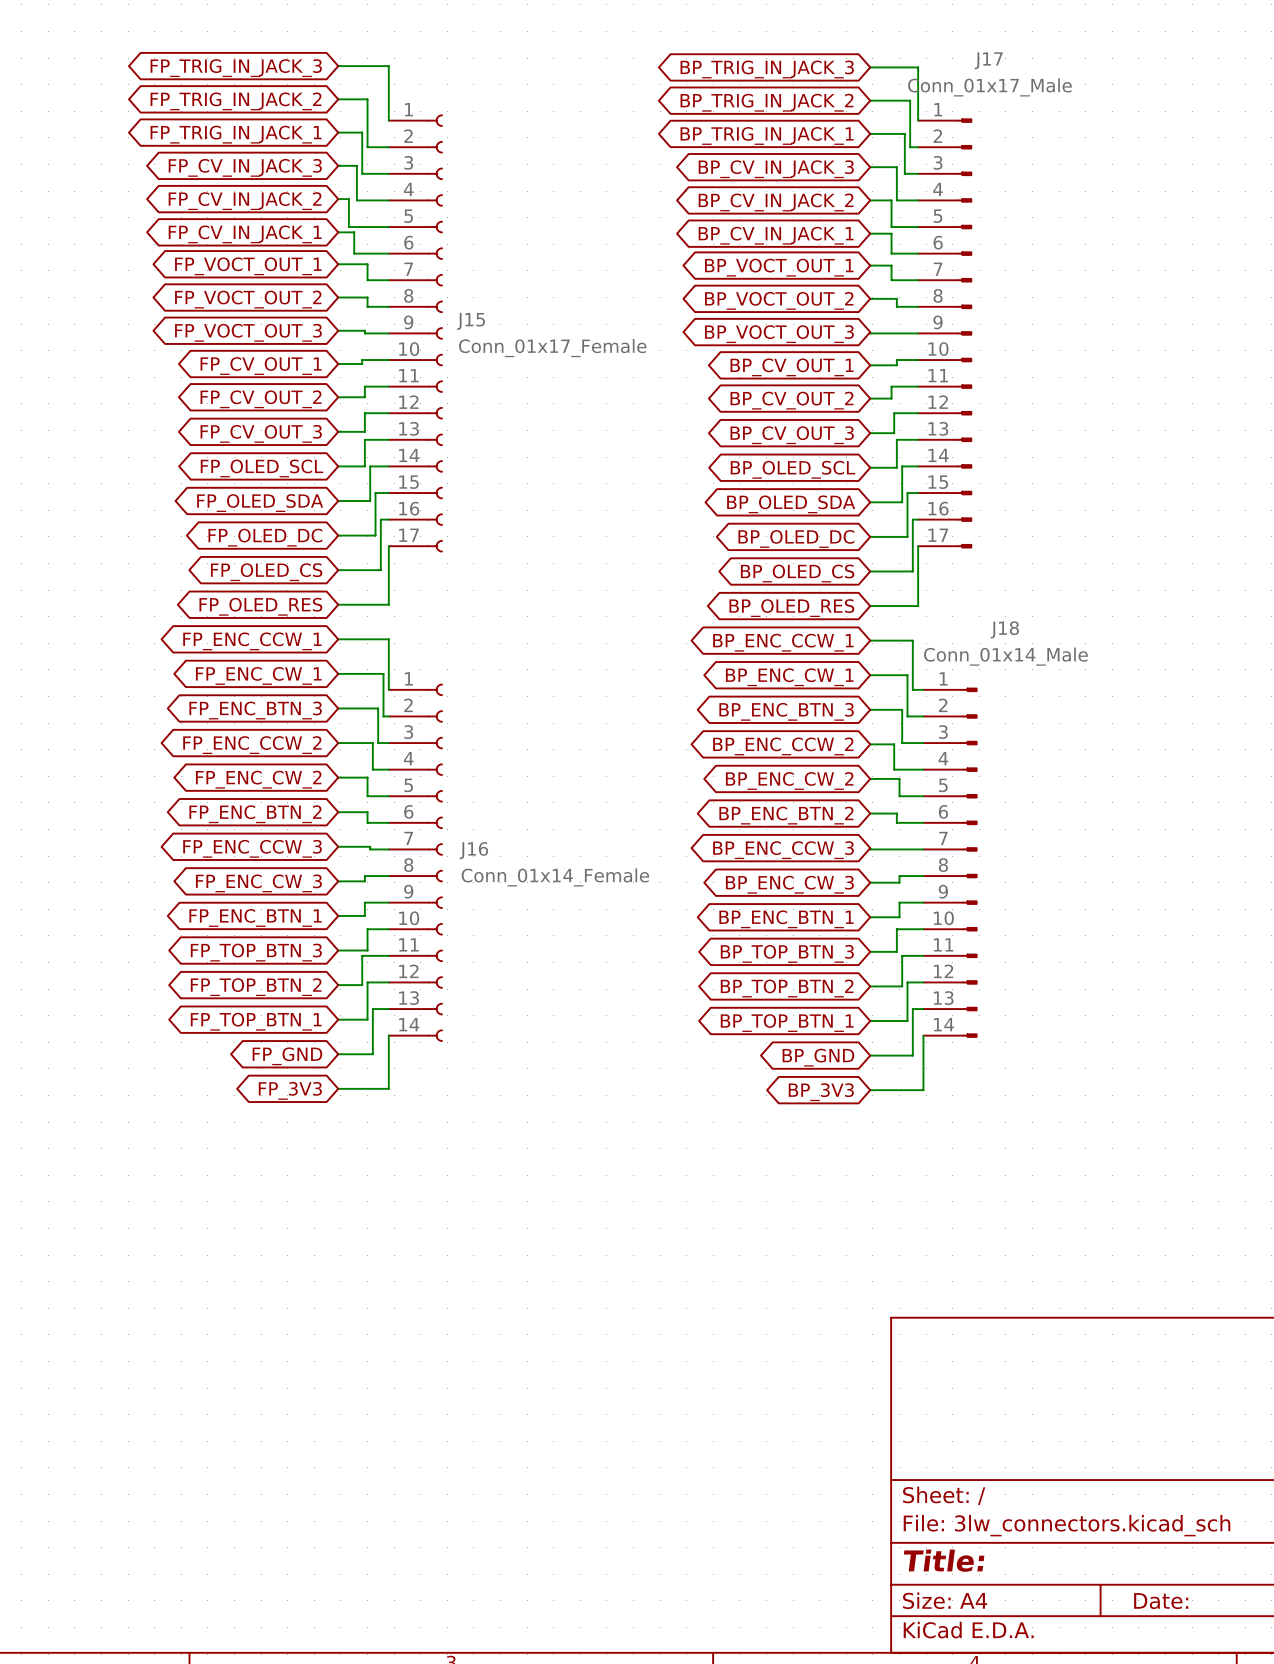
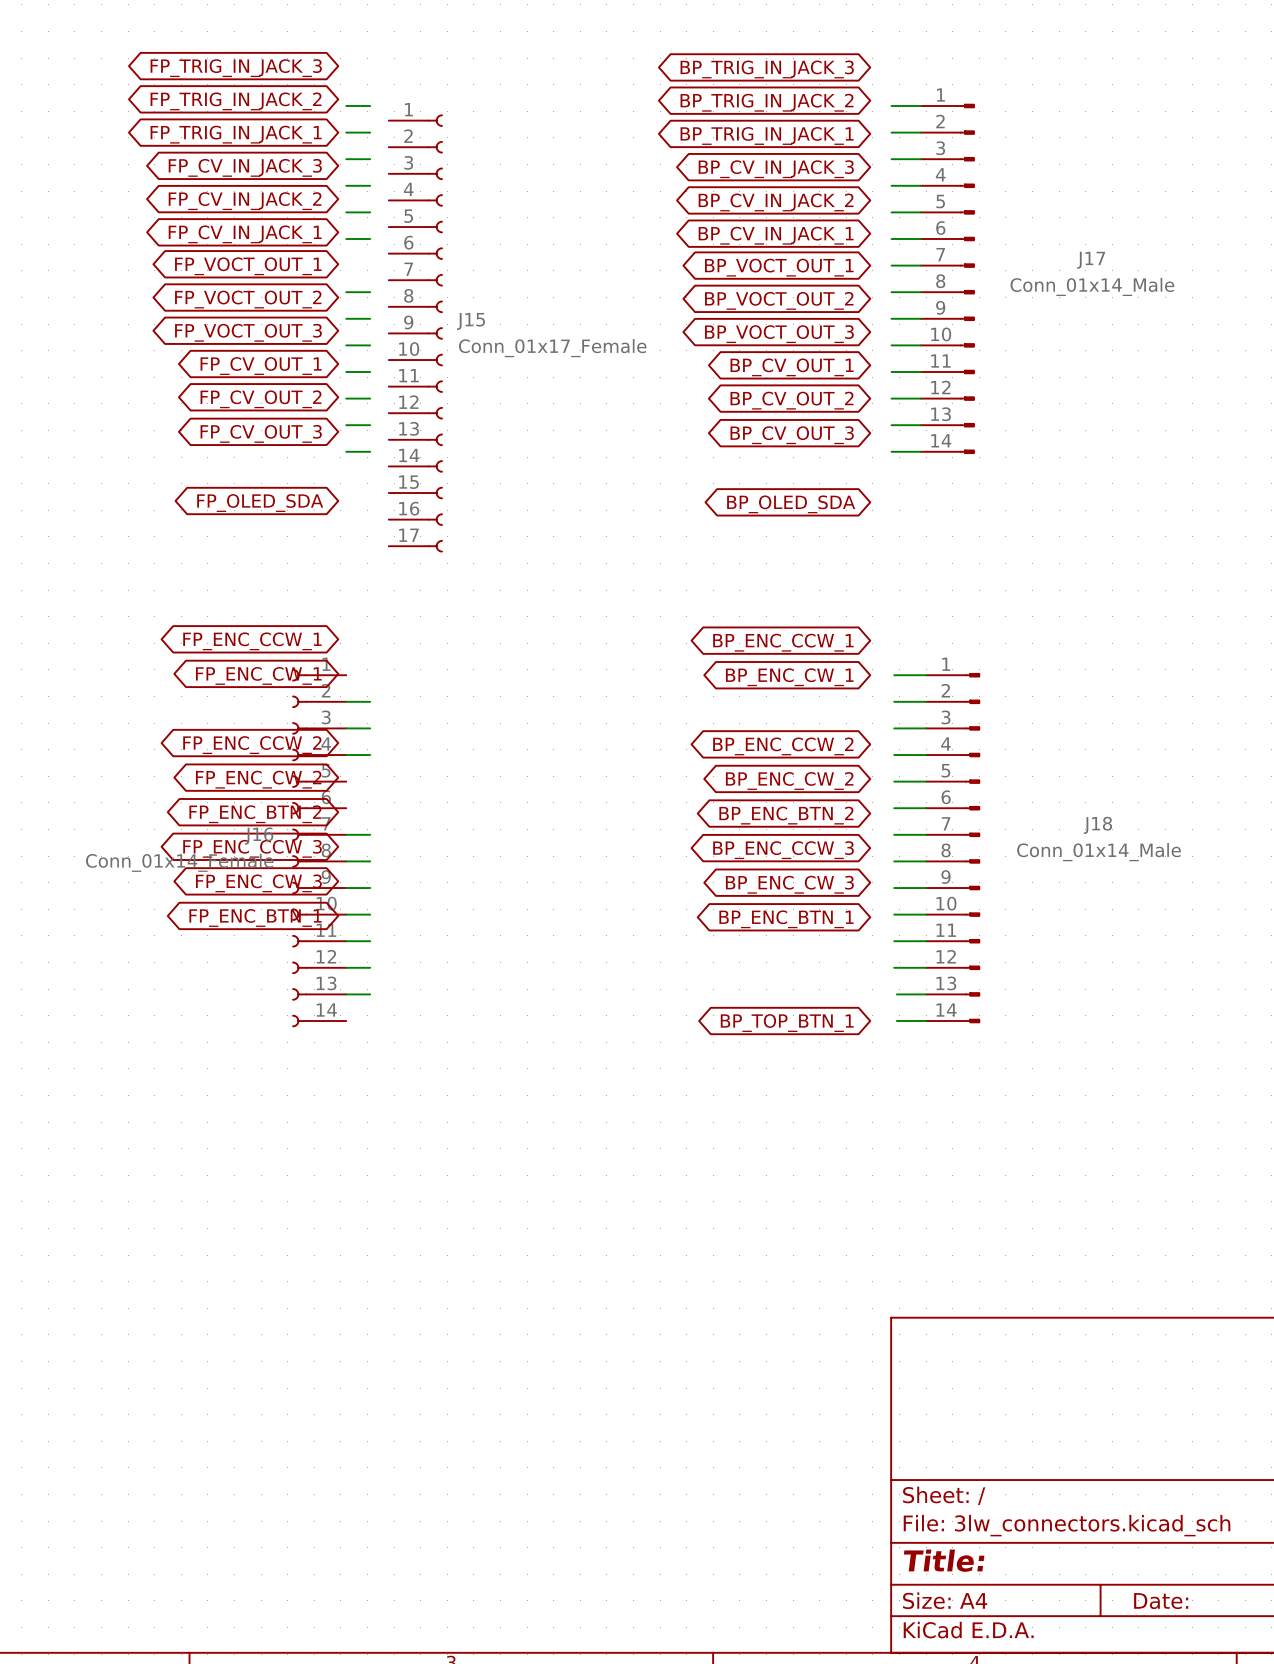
J17 name position: J17 (988, 60) -> J17 (1091, 260)
wire: (338, 66) (388, 66) (388, 120) -> none
wire: (870, 67) (918, 67) (918, 120) -> none
J17 value: Conn_01x17_Male (989, 87) -> Conn_01x14_Male (1092, 286)
wire: (338, 99) (367, 99) (367, 147) (388, 147) -> none
wire: (870, 100) (910, 100) (910, 147) (918, 147) -> none
wire: none -> (346, 106) (370, 106)
wire: none -> (891, 106) (920, 106)
J17 symbol: [918, 118, 973, 549] -> [920, 103, 975, 454]
wire: (338, 132) (346, 132) -> none
wire: (362, 132) (362, 173) (388, 173) -> (362, 132) (370, 132)
wire: none -> (891, 132) (920, 132)
wire: (870, 133) (904, 133) (904, 173) (918, 173) -> none
wire: none -> (346, 159) (370, 159)
wire: none -> (891, 159) (920, 159)
wire: (338, 165) (356, 165) (356, 200) (388, 200) -> none
wire: (870, 167) (896, 167) (896, 200) (918, 200) -> none
wire: none -> (346, 185) (370, 185)
wire: none -> (891, 185) (920, 185)
wire: (338, 199) (348, 199) (348, 227) (388, 227) -> none
wire: (870, 200) (891, 200) (891, 227) (918, 227) -> none
wire: none -> (346, 212) (370, 212)
wire: none -> (891, 212) (920, 212)
wire: (338, 232) (354, 232) (354, 253) (388, 253) -> none
wire: (870, 233) (891, 233) (891, 253) (918, 253) -> none
wire: none -> (346, 238) (370, 238)
wire: none -> (891, 238) (920, 238)
wire: (338, 264) (367, 264) (367, 280) (388, 280) -> none
wire: (870, 265) (891, 265) (891, 280) (918, 280) -> none
wire: none -> (891, 265) (920, 265)
wire: none -> (346, 292) (370, 292)
wire: none -> (891, 292) (920, 292)
wire: (338, 297) (367, 297) (367, 306) (388, 306) -> none
wire: (870, 298) (896, 298) (896, 306) (918, 306) -> none
wire: none -> (346, 318) (370, 318)
wire: none -> (891, 318) (920, 318)
wire: (338, 330) (388, 333) -> none
wire: (870, 332) (918, 333) -> none
wire: none -> (346, 345) (370, 345)
wire: none -> (891, 345) (920, 345)
wire: (388, 360) (362, 360) (362, 364) (338, 364) -> none
wire: (918, 360) (896, 360) (896, 365) (870, 365) -> none
wire: none -> (346, 371) (370, 371)
wire: none -> (891, 371) (920, 371)
wire: (388, 386) (364, 386) (364, 397) (338, 397) -> none
wire: (918, 386) (891, 386) (891, 398) (870, 398) -> none
wire: none -> (346, 398) (370, 398)
wire: none -> (891, 398) (920, 398)
wire: (388, 413) (364, 413) (364, 431) (338, 431) -> none
wire: (918, 413) (894, 413) (894, 433) (870, 433) -> none
wire: none -> (346, 425) (370, 425)
wire: none -> (891, 425) (920, 425)
wire: (388, 439) (364, 439) (364, 466) (338, 466) -> none
wire: (918, 439) (896, 439) (896, 467) (870, 467) -> none
wire: none -> (346, 451) (370, 451)
wire: none -> (891, 451) (920, 451)
wire: (388, 466) (370, 466) (370, 501) (338, 501) -> none
wire: (918, 466) (902, 466) (902, 502) (870, 502) -> none
global label: FP_OLED_SCL (262, 468) -> none
global label: BP_OLED_SCL (792, 469) -> none
wire: (388, 493) (375, 493) (375, 535) (338, 535) -> none
wire: (918, 493) (907, 493) (907, 536) (870, 536) -> none
wire: (388, 519) (380, 519) (380, 570) (338, 570) -> none
wire: (918, 519) (912, 519) (912, 571) (870, 571) -> none
global label: FP_OLED_DC (265, 537) -> none
global label: BP_OLED_DC (796, 538) -> none
wire: (388, 546) (388, 604) (338, 604) -> none
wire: (918, 546) (918, 606) (870, 606) -> none
global label: FP_OLED_CS (266, 572) -> none
global label: BP_OLED_CS (797, 573) -> none
global label: FP_OLED_RES (260, 606) -> none
global label: BP_OLED_RES (791, 608) -> none
J18 name position: J18 (1004, 629) -> J18 (1097, 825)
wire: (338, 639) (388, 639) (388, 689) -> none
wire: (870, 640) (912, 640) (912, 689) (923, 689) -> none
J18 value position: Conn_01x14_Male (1005, 656) -> Conn_01x14_Male (1099, 852)
wire: (338, 673) (383, 673) (383, 716) (388, 716) -> none
wire: (870, 675) (894, 675) -> none
wire: (907, 675) (907, 716) (923, 716) -> (907, 675) (926, 675)
wire: none -> (346, 701) (370, 701)
wire: none -> (894, 701) (926, 701)
wire: (338, 708) (378, 708) (378, 743) (388, 743) -> none
wire: (870, 709) (902, 709) (902, 743) (923, 743) -> none
global label: FP_ENC_BTN_3 (255, 710) -> none
global label: BP_ENC_BTN_3 (786, 711) -> none
wire: none -> (346, 728) (370, 728)
wire: none -> (894, 728) (926, 728)
wire: (338, 743) (372, 743) (372, 769) (388, 769) -> none
wire: (870, 744) (894, 744) (894, 769) (923, 769) -> none
wire: none -> (346, 755) (370, 755)
wire: none -> (894, 755) (926, 755)
wire: (338, 777) (367, 777) (367, 796) (388, 796) -> none
wire: (870, 778) (899, 778) (899, 796) (923, 796) -> none
wire: none -> (894, 781) (926, 781)
wire: none -> (894, 808) (926, 808)
wire: (338, 812) (367, 812) (367, 822) (388, 822) -> none
wire: (870, 813) (896, 813) (896, 822) (923, 822) -> none
wire: none -> (346, 834) (370, 834)
wire: none -> (894, 834) (926, 834)
wire: (338, 846) (370, 846) (370, 849) (388, 849) -> none
wire: (870, 848) (923, 849) -> none
wire: none -> (346, 861) (370, 861)
wire: none -> (894, 861) (926, 861)
J16 flip: as is (435, 862) -> left-right (299, 848)
J18 position: (950, 862) -> (953, 848)
wire: (388, 876) (364, 876) (364, 881) (338, 881) -> none
wire: (923, 876) (899, 876) (899, 882) (870, 882) -> none
wire: none -> (346, 888) (370, 888)
wire: none -> (894, 888) (926, 888)
wire: (388, 902) (364, 902) (364, 915) (338, 915) -> none
wire: (923, 902) (899, 902) (899, 917) (870, 917) -> none
wire: none -> (346, 914) (370, 914)
wire: none -> (894, 914) (926, 914)
wire: (388, 929) (367, 929) (367, 950) (338, 950) -> none
wire: (923, 929) (896, 929) (896, 951) (870, 951) -> none
wire: none -> (346, 941) (370, 941)
wire: none -> (894, 941) (926, 941)
global label: FP_TOP_BTN_3 (256, 952) -> none
global label: BP_TOP_BTN_3 (787, 953) -> none
wire: (388, 955) (362, 955) (362, 985) (338, 985) -> none
wire: (923, 955) (902, 955) (902, 986) (870, 986) -> none
wire: none -> (346, 967) (370, 967)
wire: none -> (894, 967) (926, 967)
wire: (388, 982) (367, 982) (367, 1019) (338, 1019) -> none
wire: (923, 982) (907, 982) (907, 1021) -> (926, 1021) (907, 1021)
global label: FP_TOP_BTN_2 (256, 987) -> none
global label: BP_TOP_BTN_2 (787, 988) -> none
wire: none -> (346, 994) (370, 994)
wire: none -> (896, 994) (926, 994)
wire: (388, 1009) (372, 1009) (372, 1054) (338, 1054) -> none
wire: (923, 1009) (912, 1009) (912, 1055) (870, 1055) -> none
global label: FP_TOP_BTN_1 (256, 1021) -> none
wire: (870, 1021) (896, 1021) -> none
wire: (388, 1035) (388, 1088) (338, 1088) -> none
wire: (923, 1035) (923, 1090) (870, 1090) -> none
global label: FP_GND (287, 1056) -> none
global label: BP_GND (818, 1057) -> none
global label: FP_3V3 (290, 1090) -> none
global label: BP_3V3 (821, 1092) -> none

